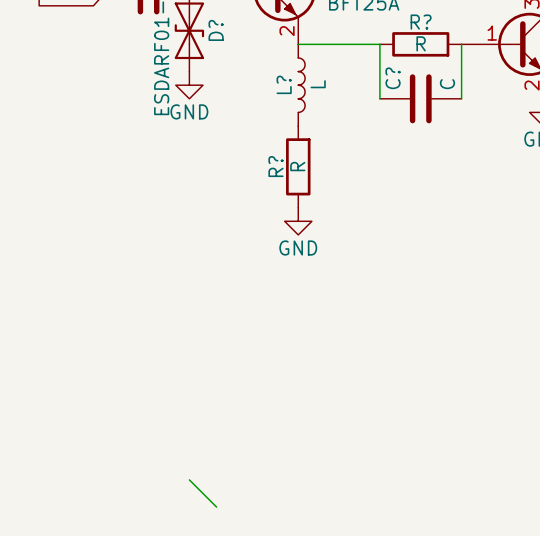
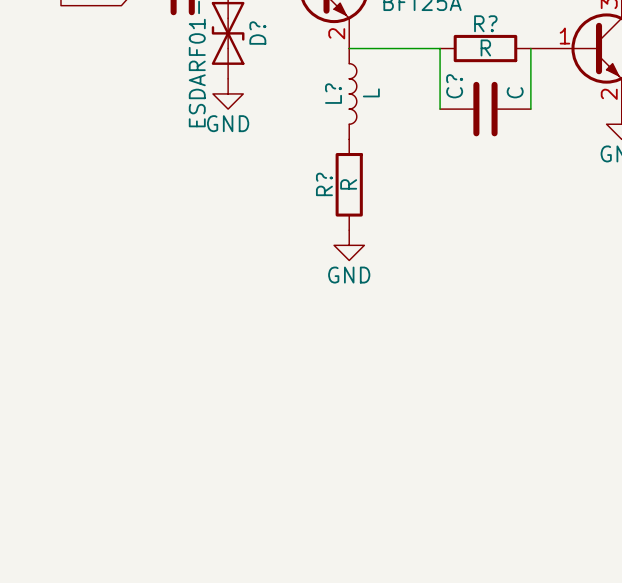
wire: (189, 479) (216, 507) -> none

